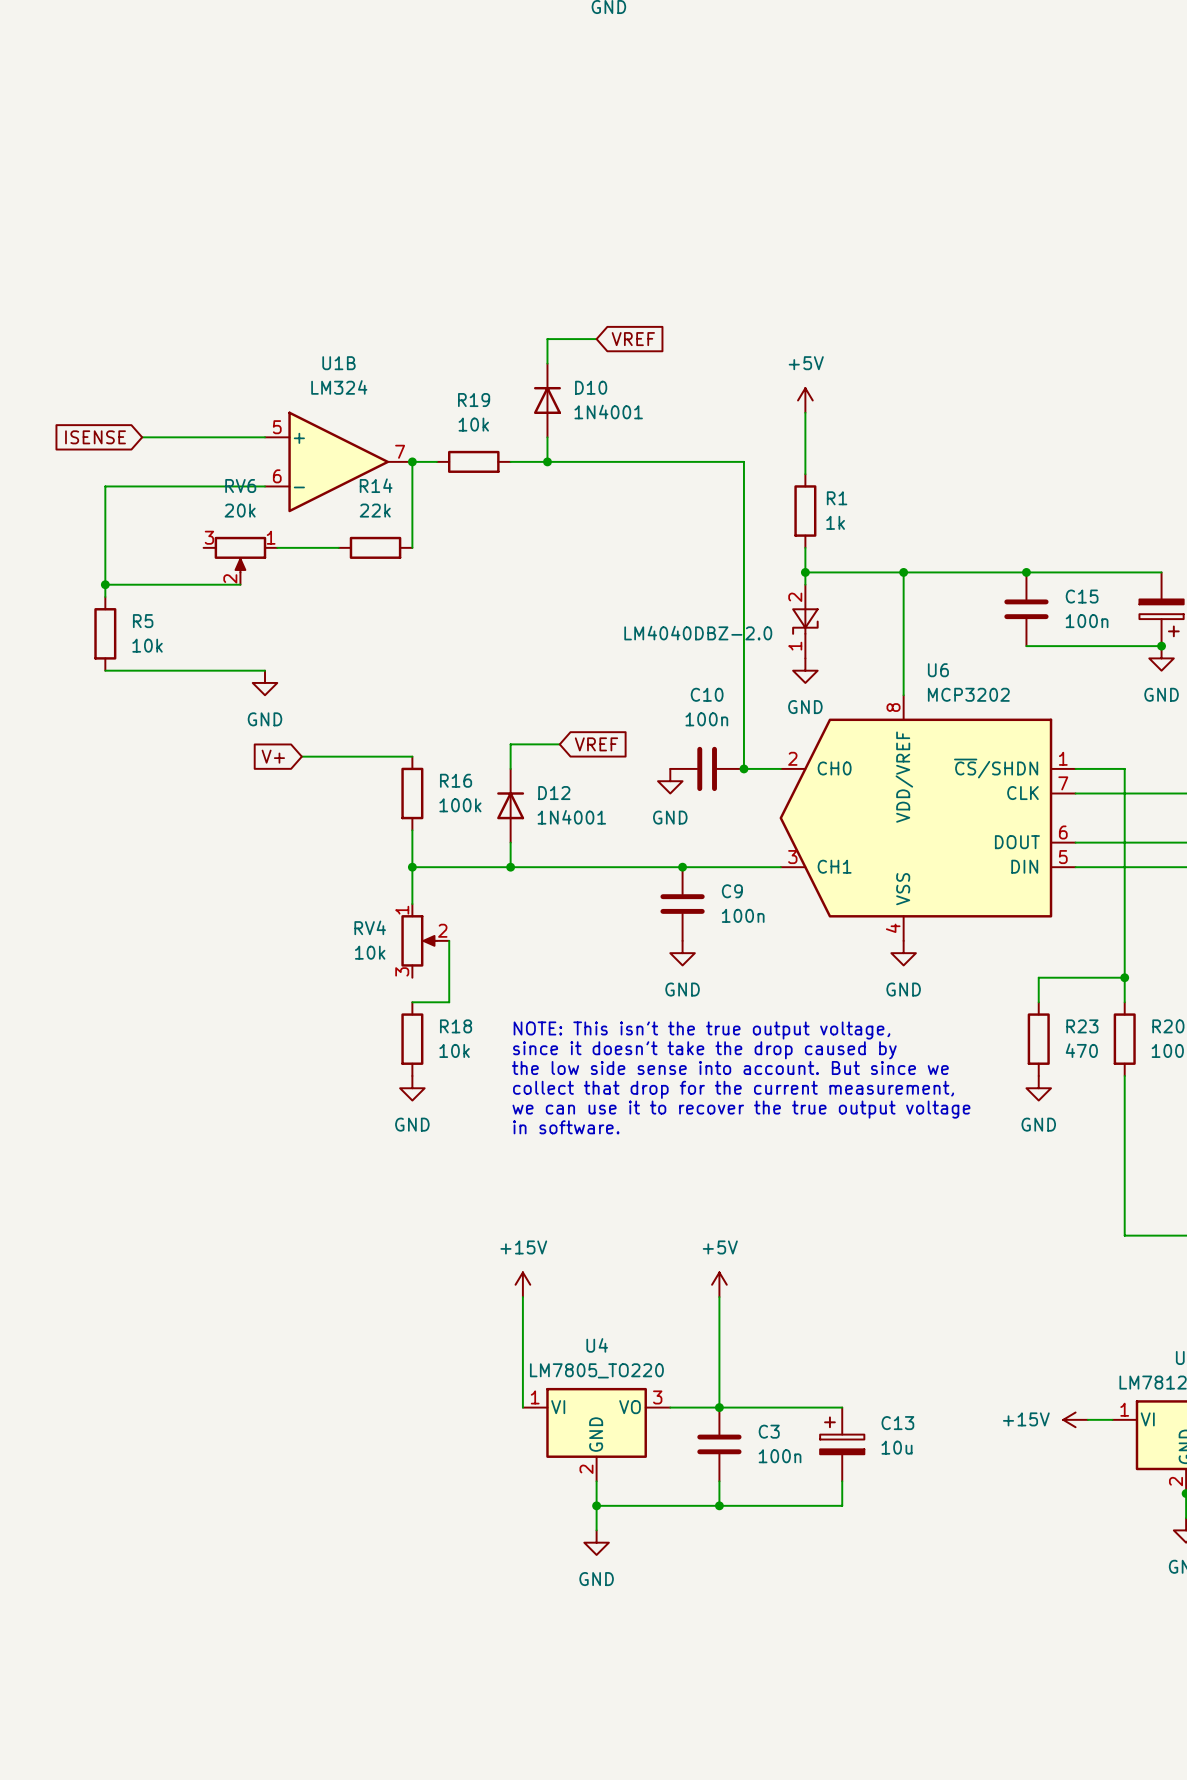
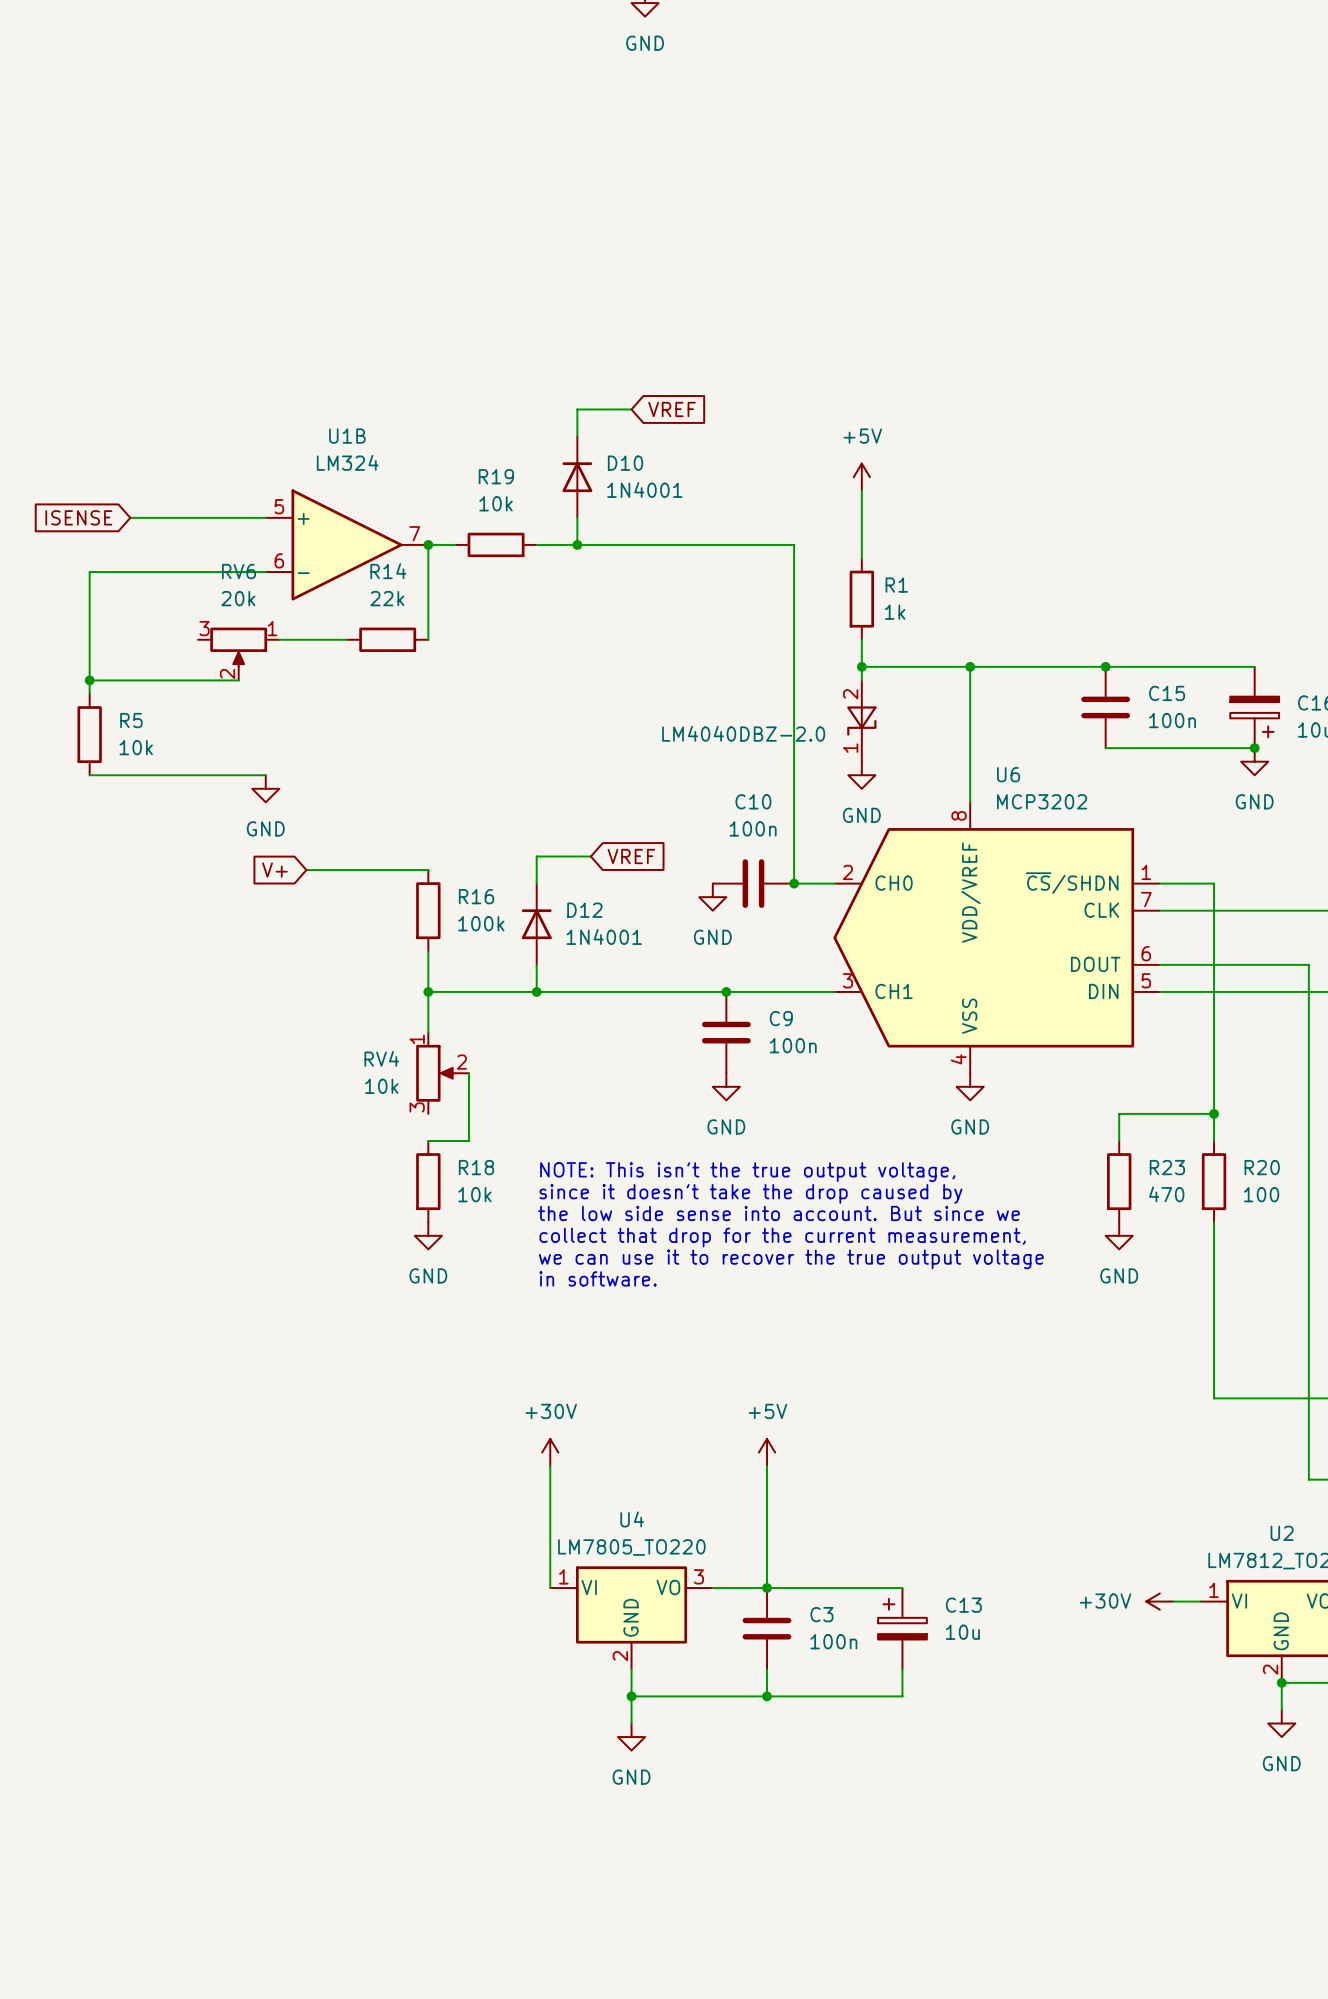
power symbol: +15V (522, 1284) -> +30V (550, 1452)
power symbol: +15V (1075, 1419) -> +30V (1159, 1601)

